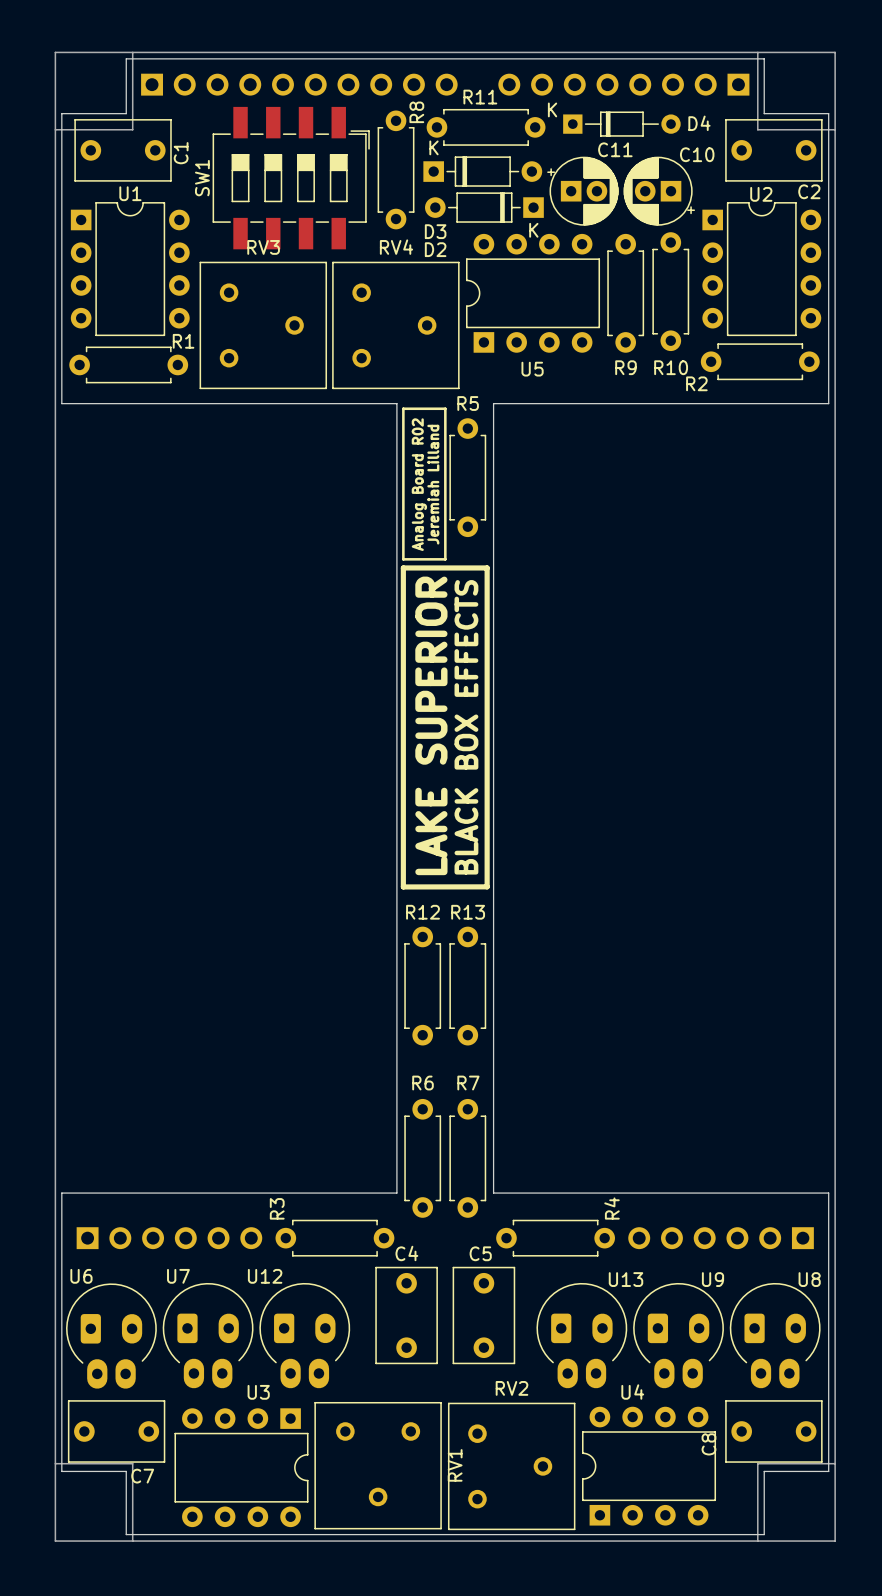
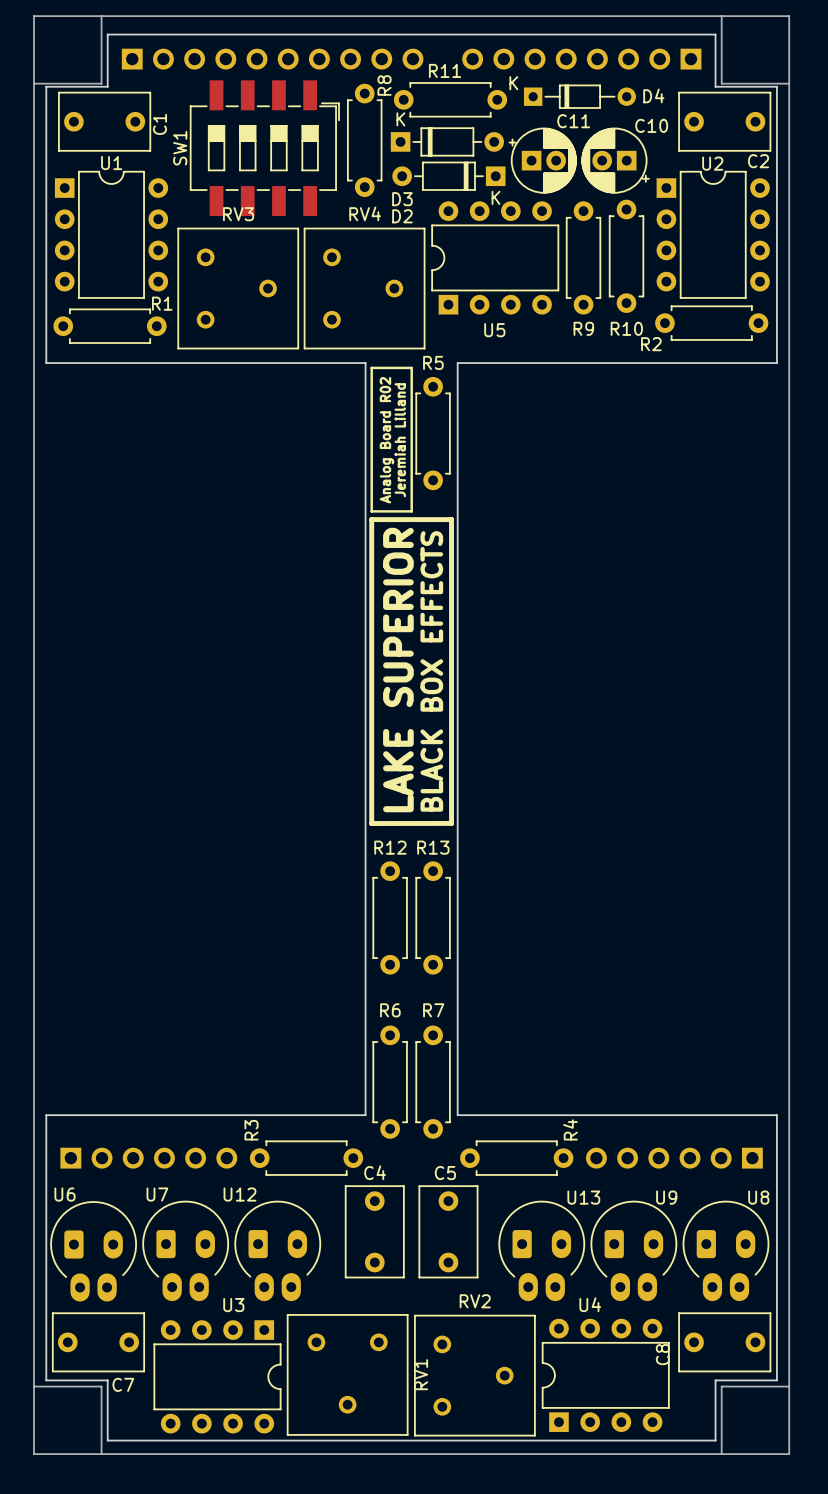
line: none -> (101, 16) (101, 83) (34, 83)
line: none -> (721, 16) (721, 83) (789, 83)
line: (55, 52) (835, 52) (835, 1541) (55, 1541) (55, 52) -> (34, 16) (34, 1454) (789, 1454) (789, 16) (34, 16)
line: (132, 52) (132, 129) (55, 129) -> none
line: (757, 52) (757, 129) (835, 129) -> none
line: (55, 1463) (132, 1463) (132, 1541) -> none
line: (835, 1463) (757, 1463) (757, 1541) -> none
line: none -> (34, 1386) (101, 1386) (101, 1454)
line: none -> (789, 1386) (721, 1386) (721, 1454)

